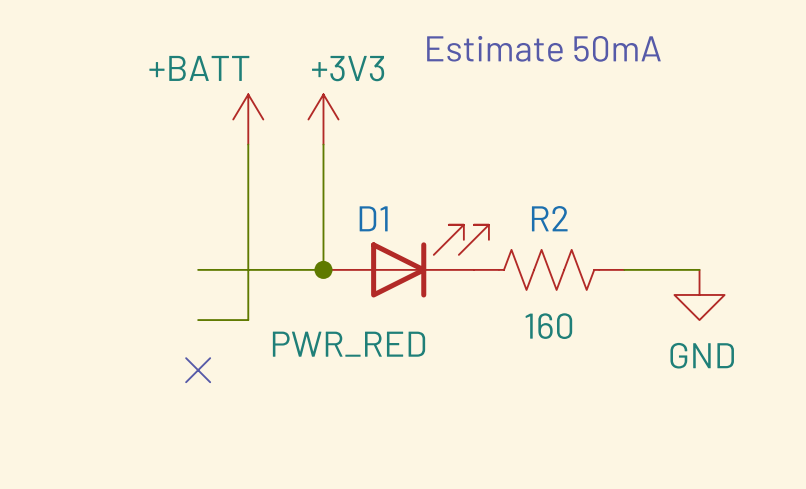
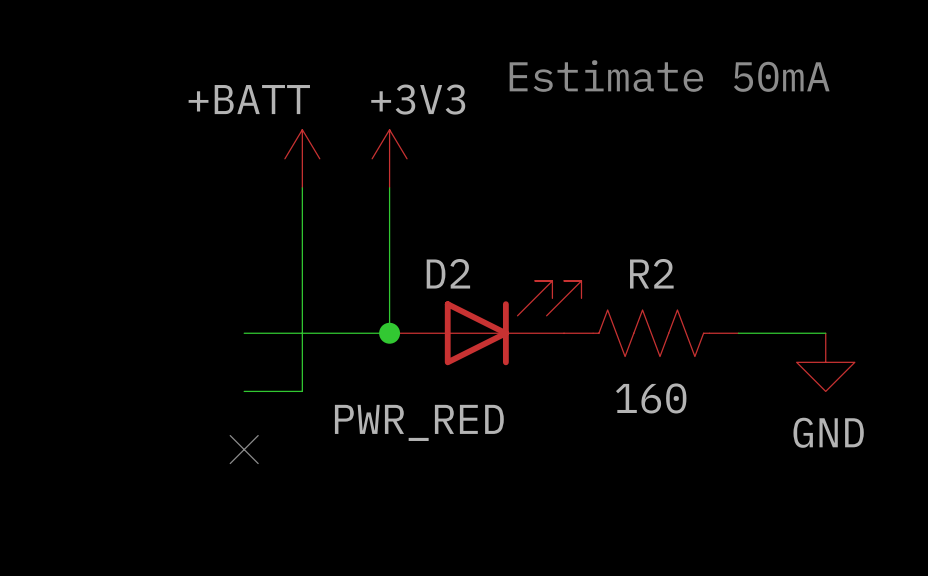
D1 name: D1 (373, 218) -> D2 (448, 273)

